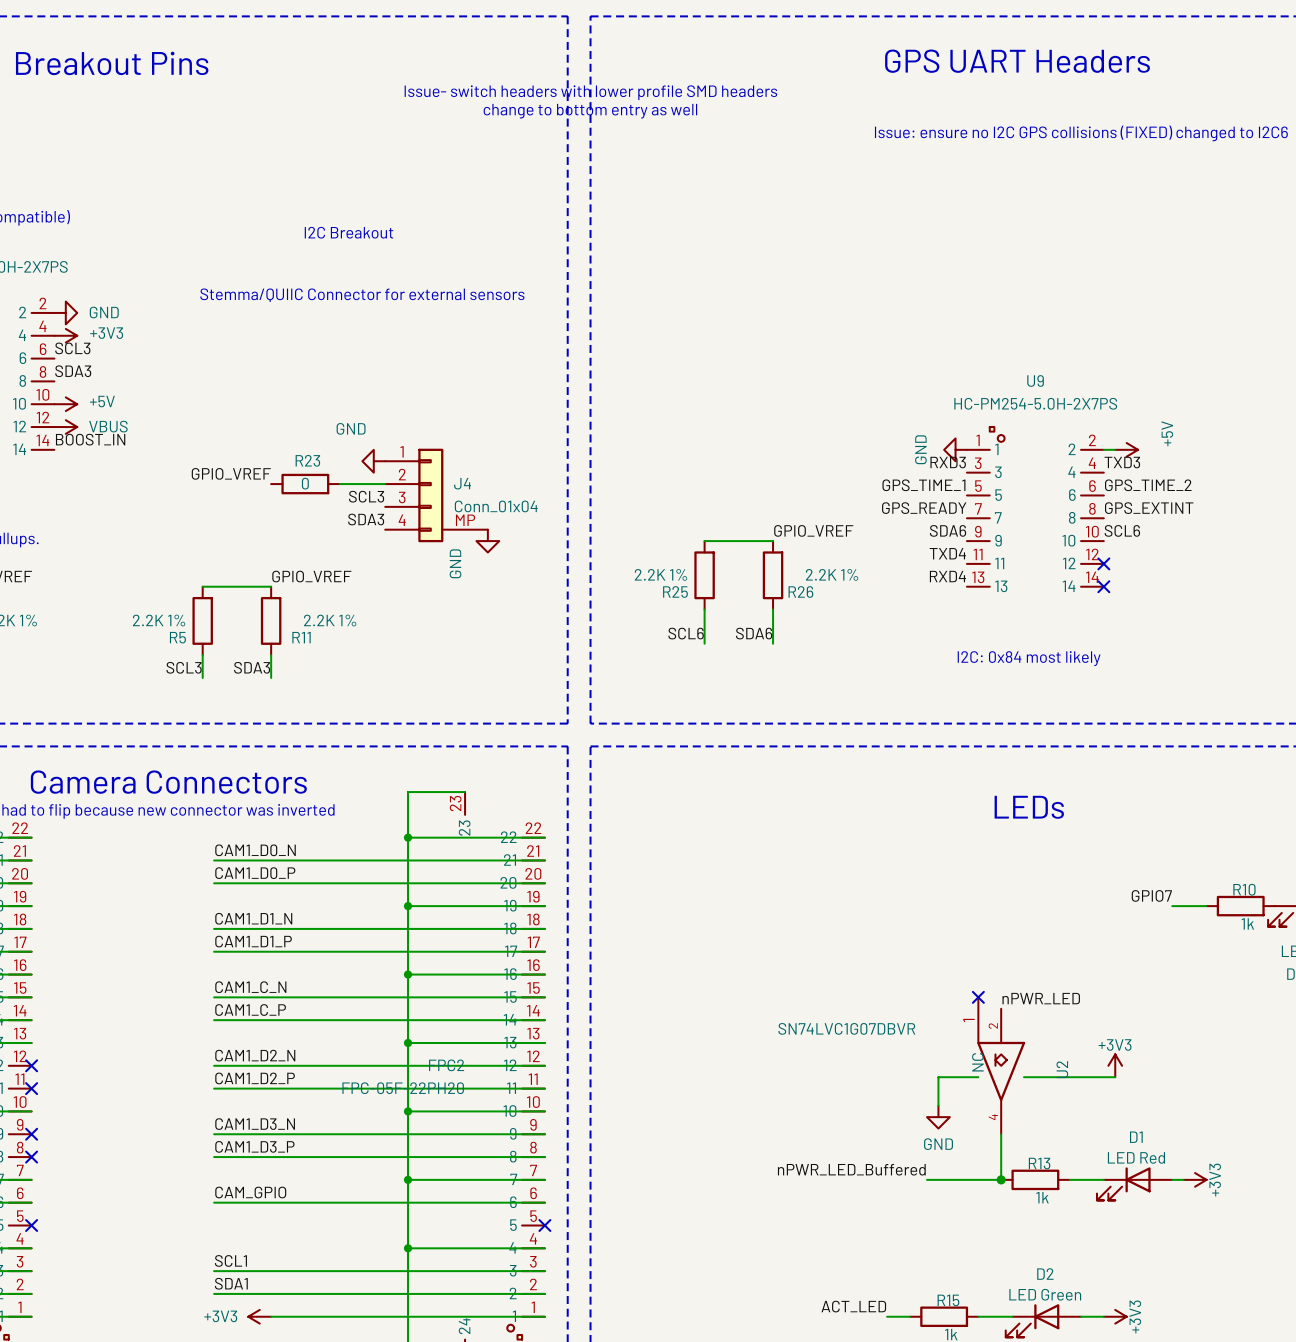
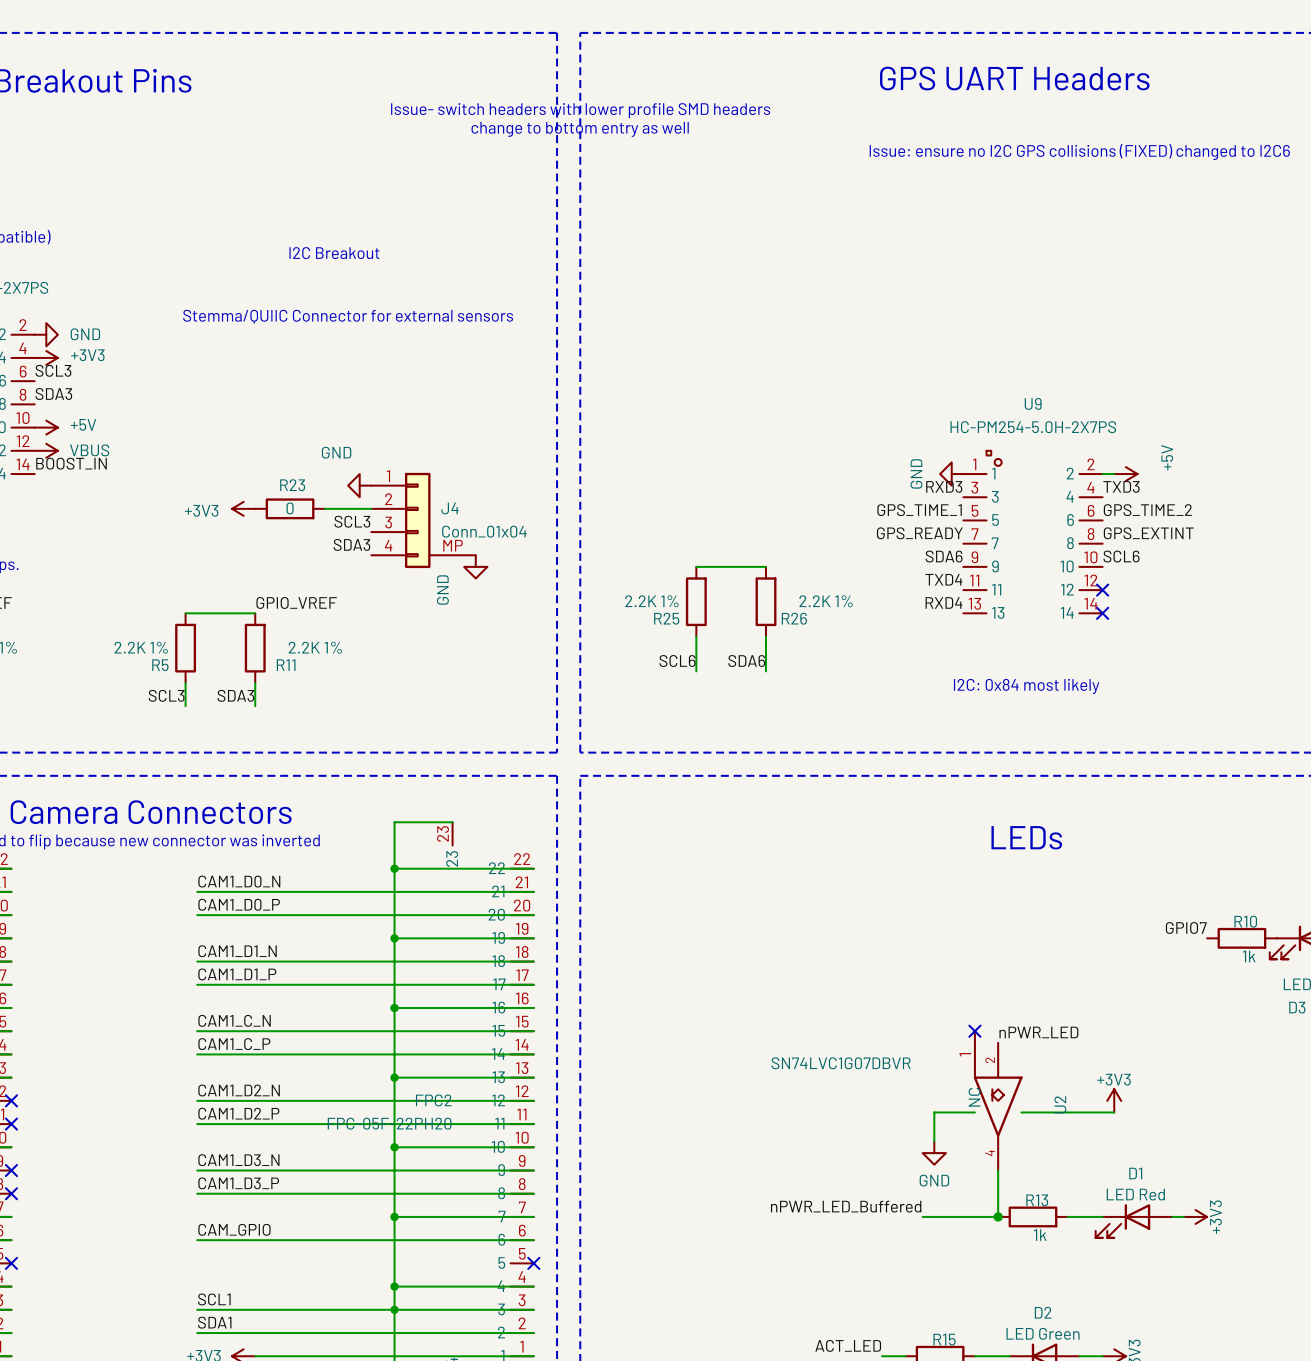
label: GPIO_VREF (231, 473) -> none
power symbol: none -> +3V3 (243, 508)
label: GPIO_VREF (813, 530) -> none
label position: GPIO7 (1151, 895) -> GPIO7 (1186, 927)
wire: (1172, 906) (1206, 906) -> none
junction: none -> (394, 1309)

